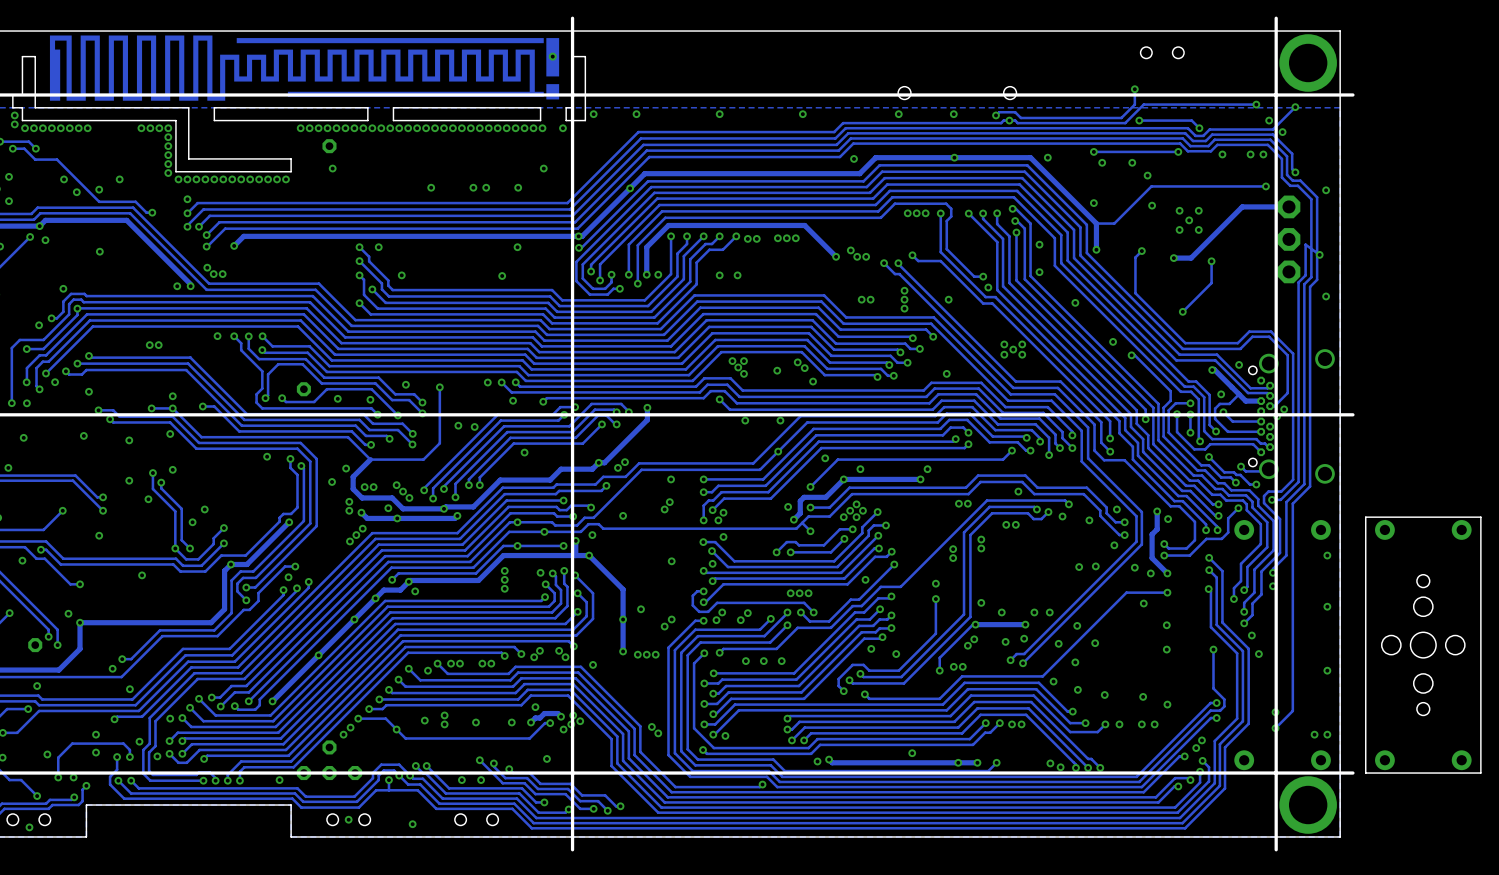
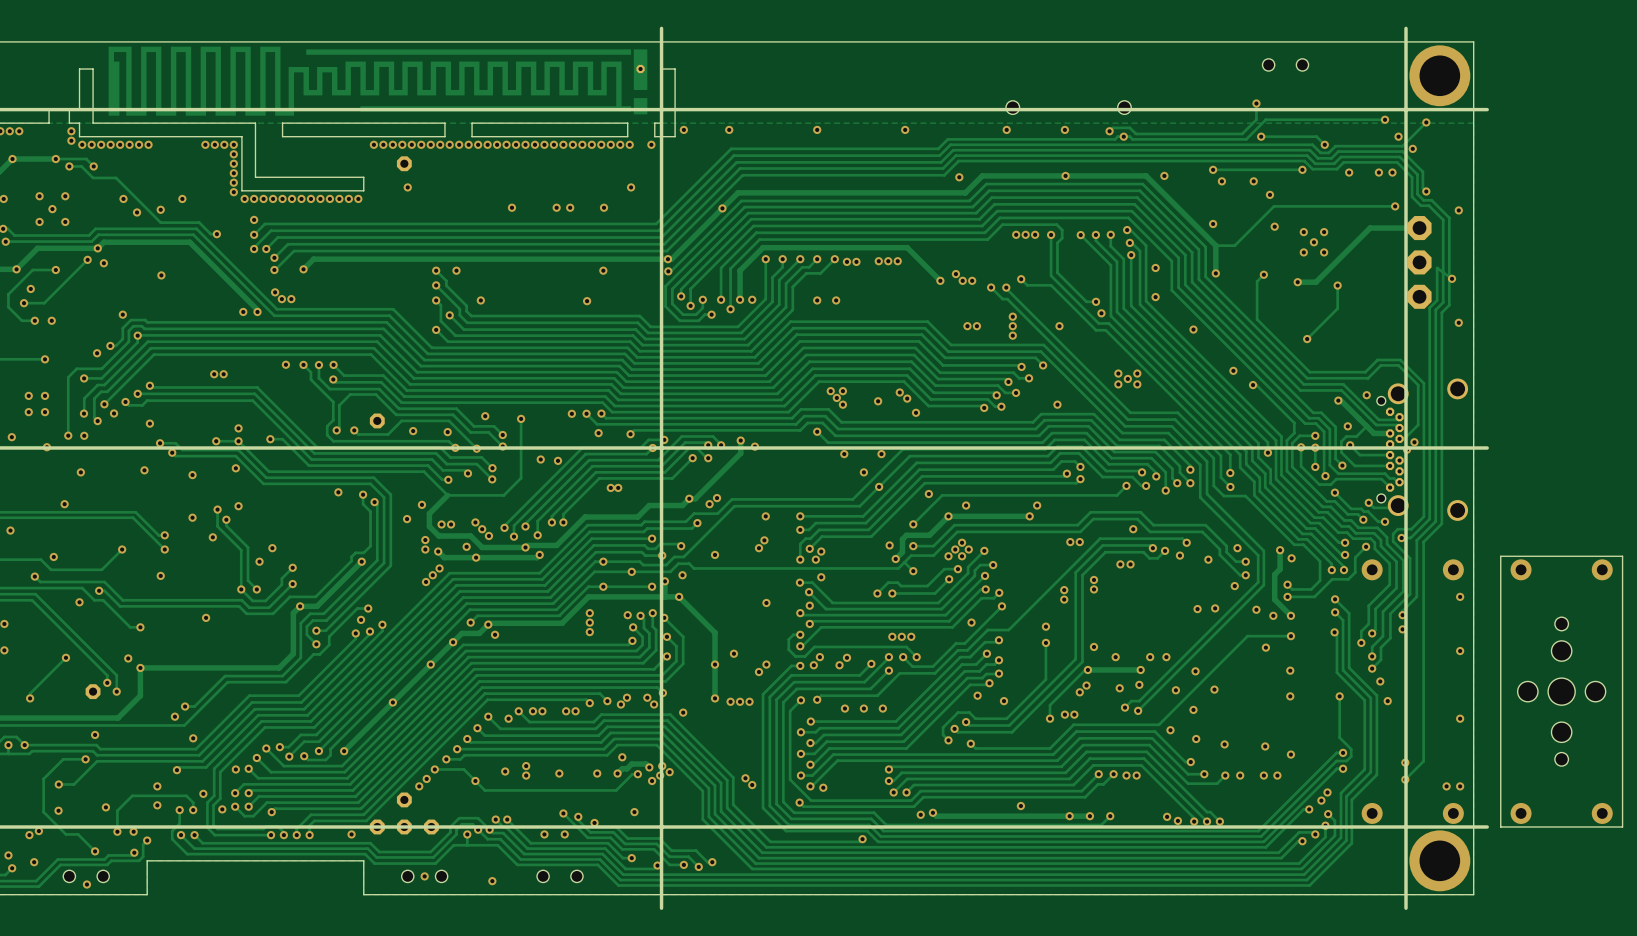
via: none -> (754, 446)
via: none -> (863, 472)
via: none -> (618, 487)

